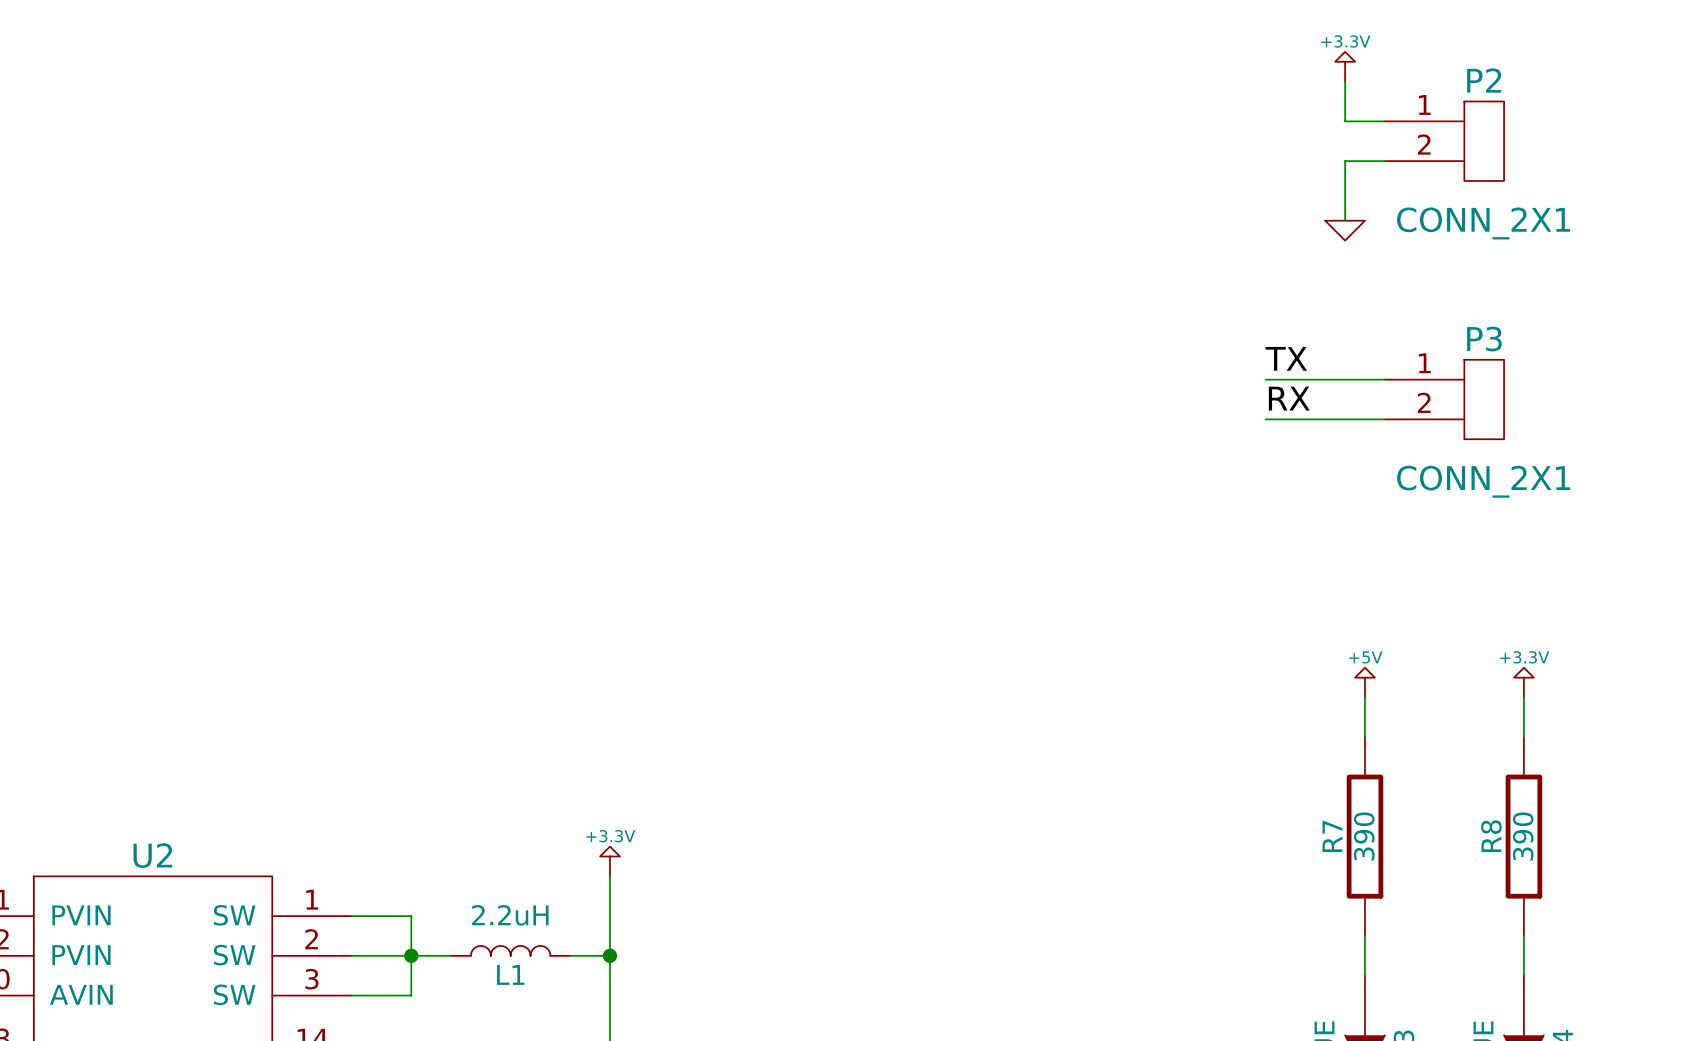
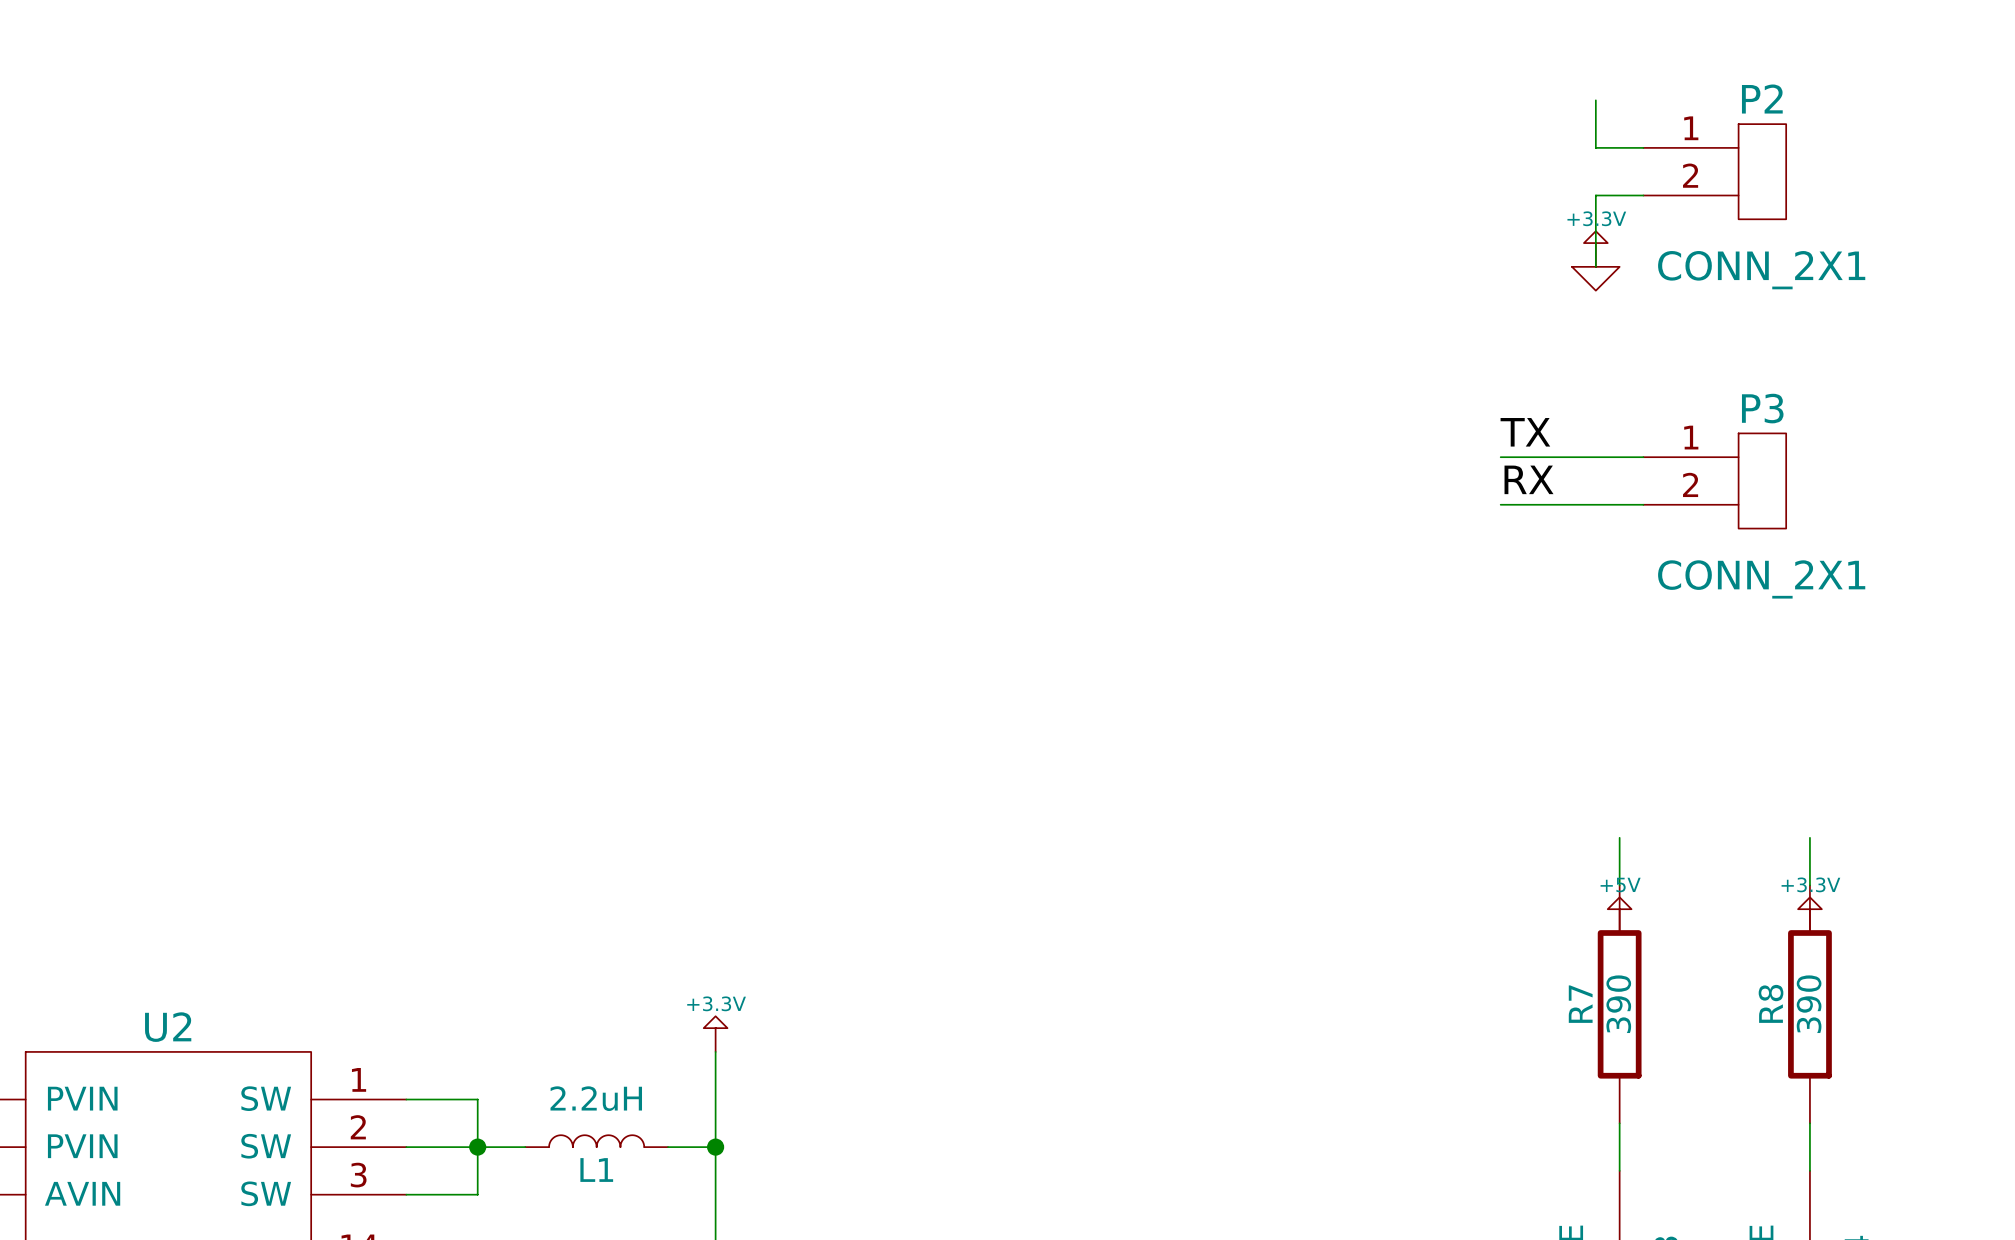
power symbol position: +3.3V (1345, 66) -> +3.3V (1595, 249)
power symbol position: +5V (1364, 682) -> +5V (1619, 915)
power symbol position: +3.3V (1523, 682) -> +3.3V (1809, 915)

